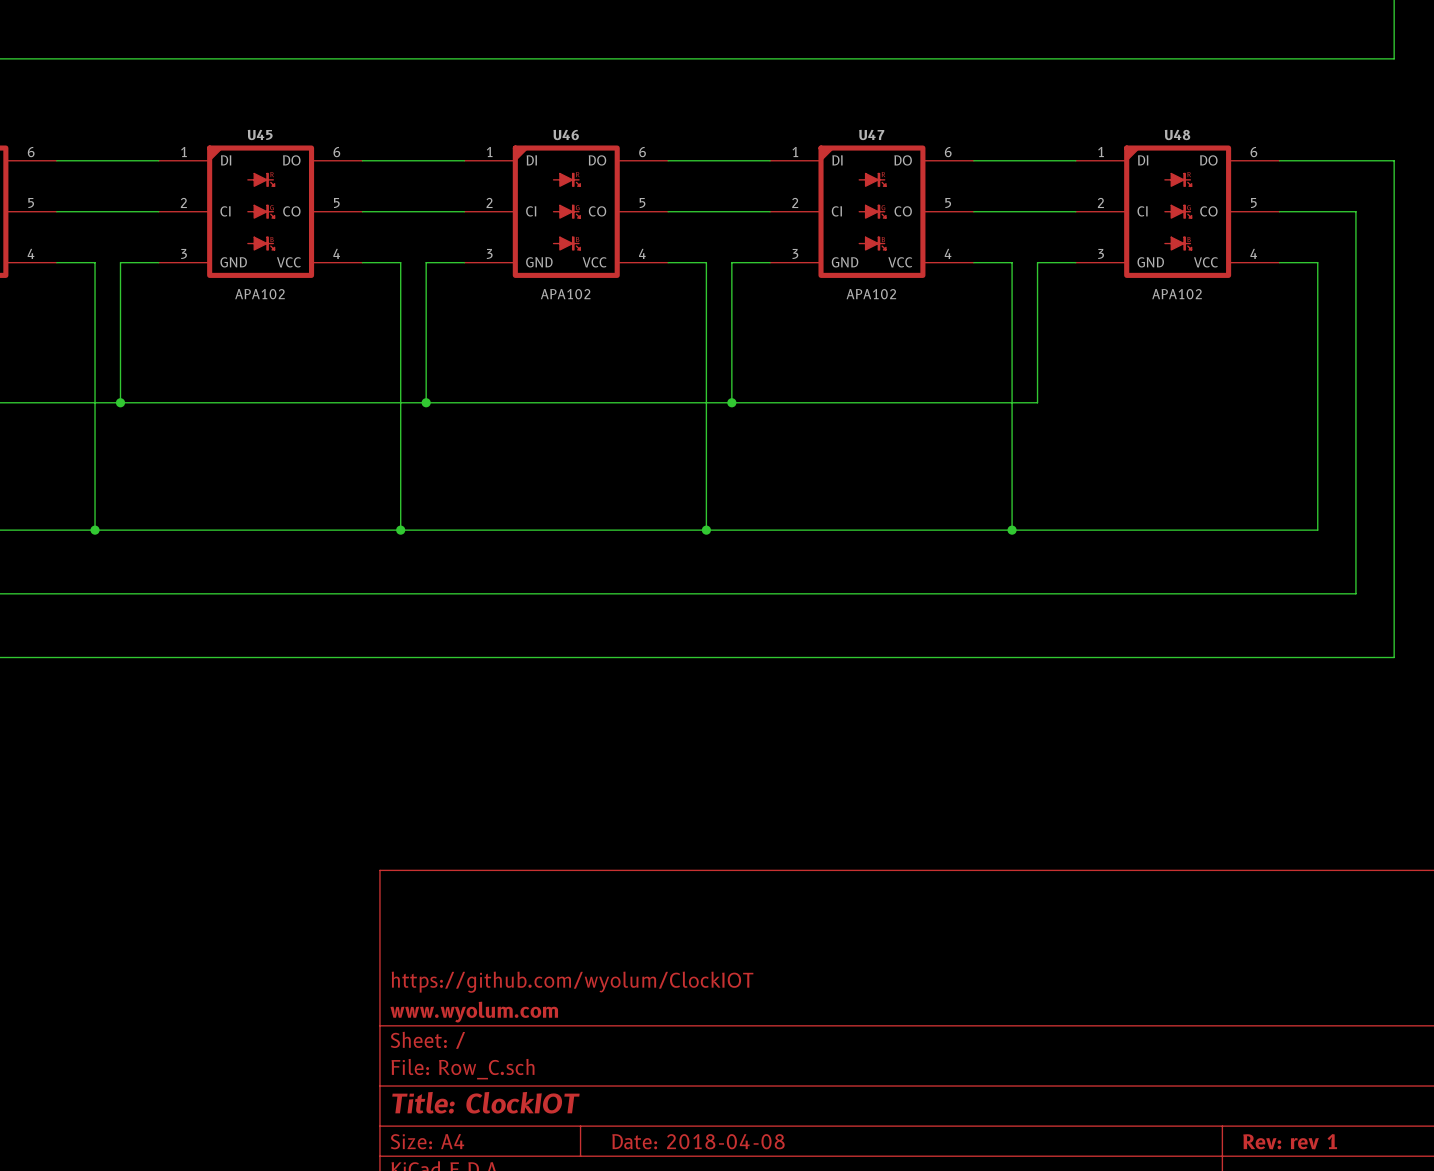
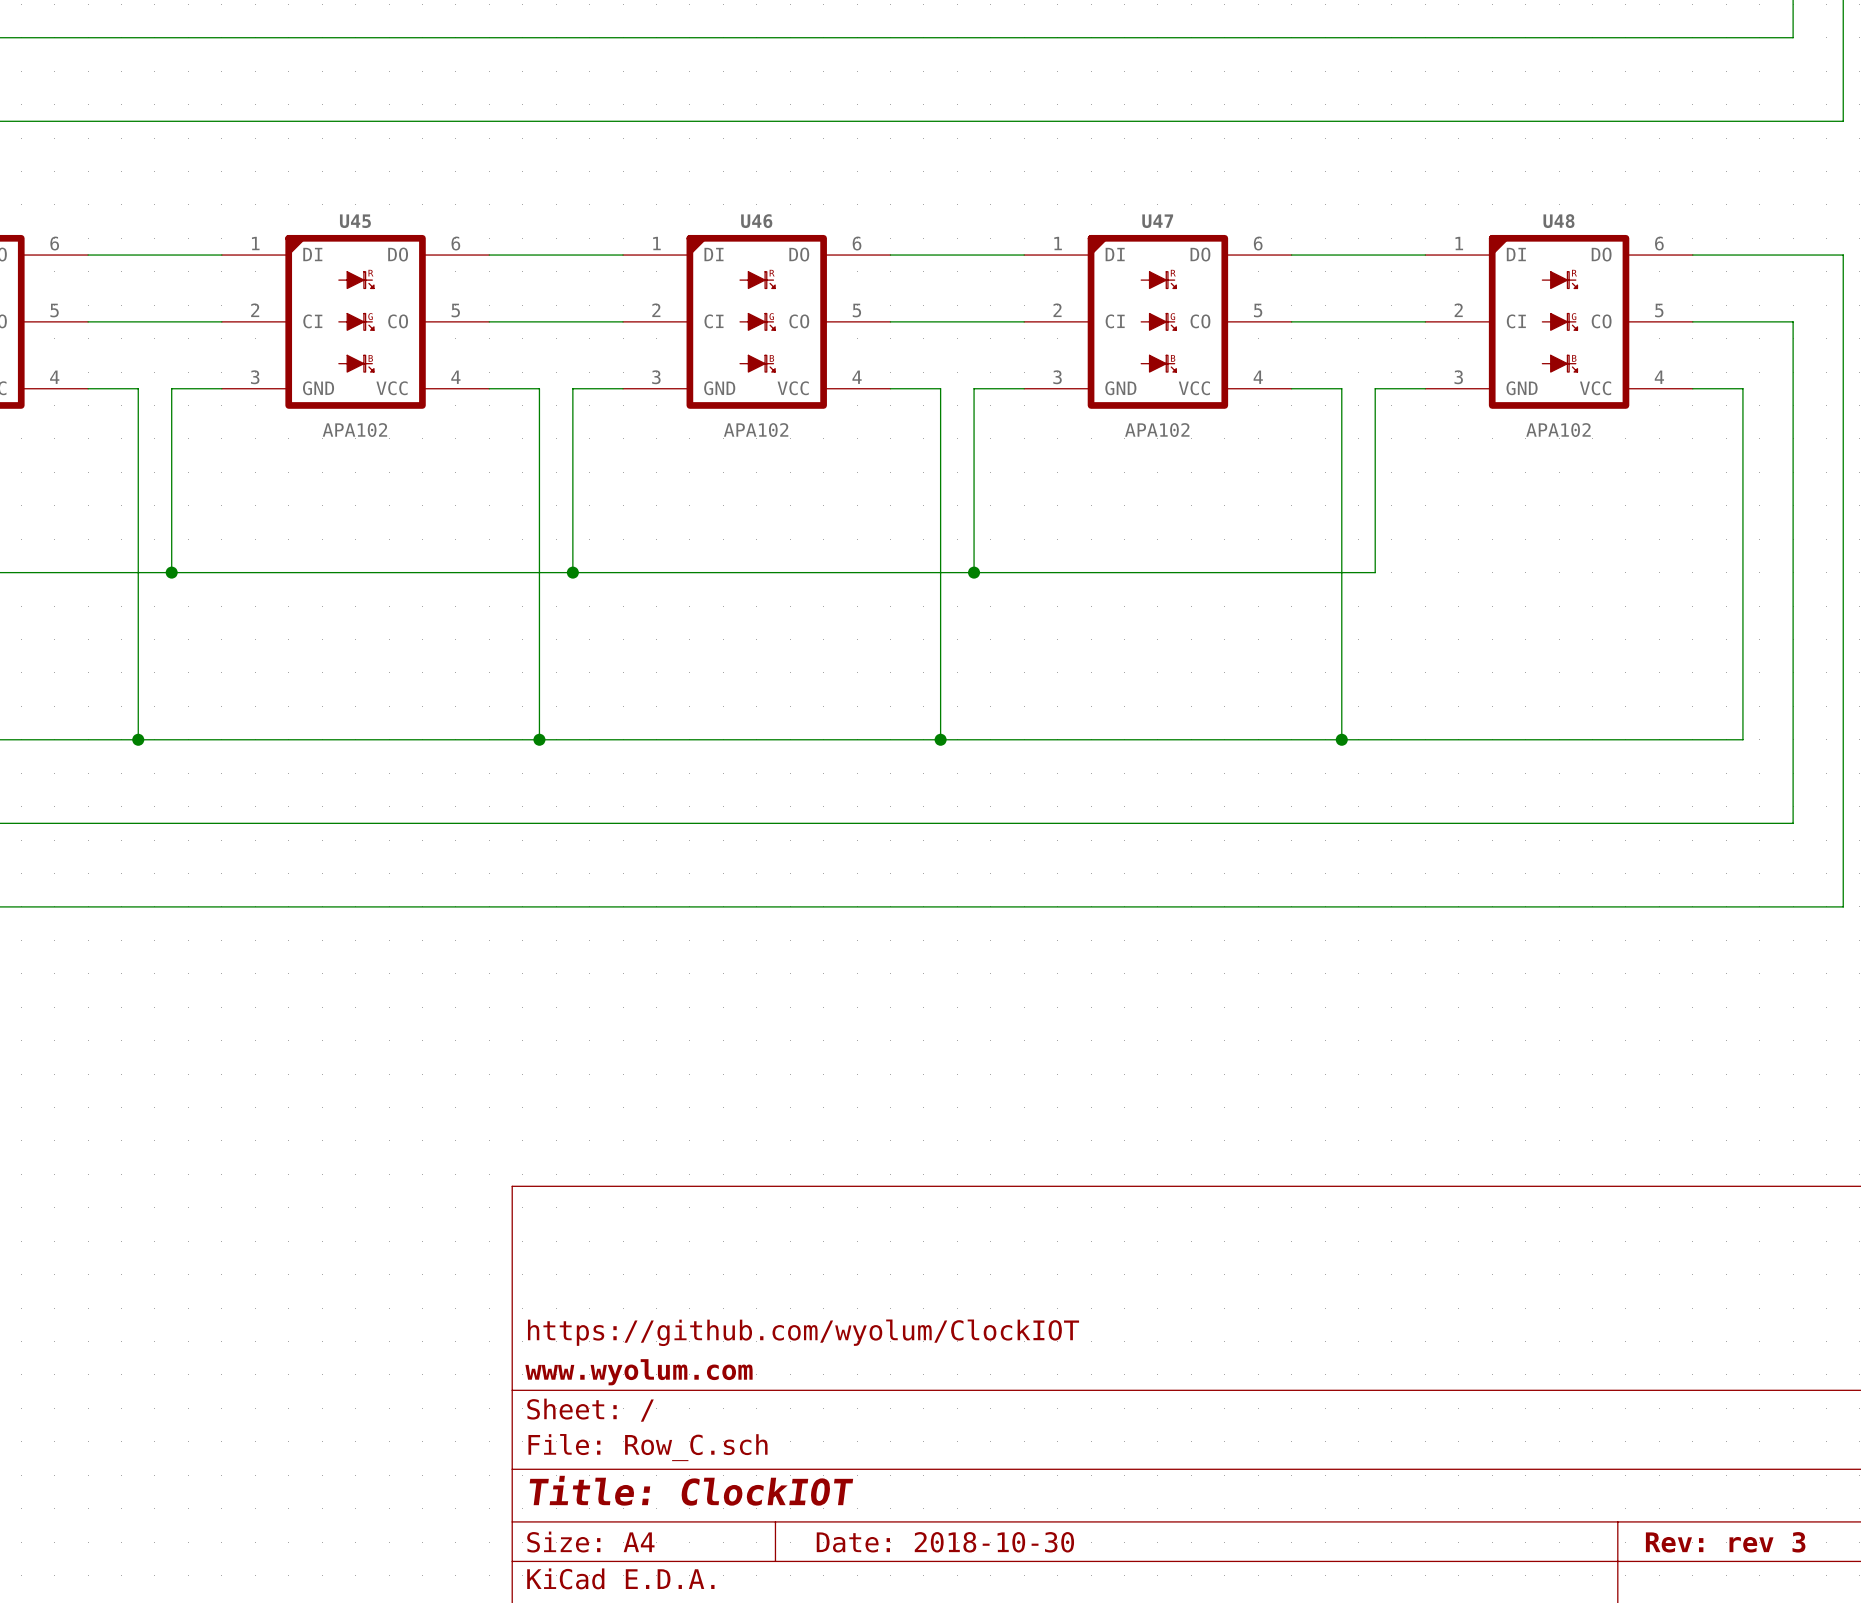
title block: Date: 2018-04-08 (698, 1141) -> Date: 2018-10-30 (945, 1542)
title block: Rev: rev 1 (1290, 1141) -> Rev: rev 3 (1725, 1542)

